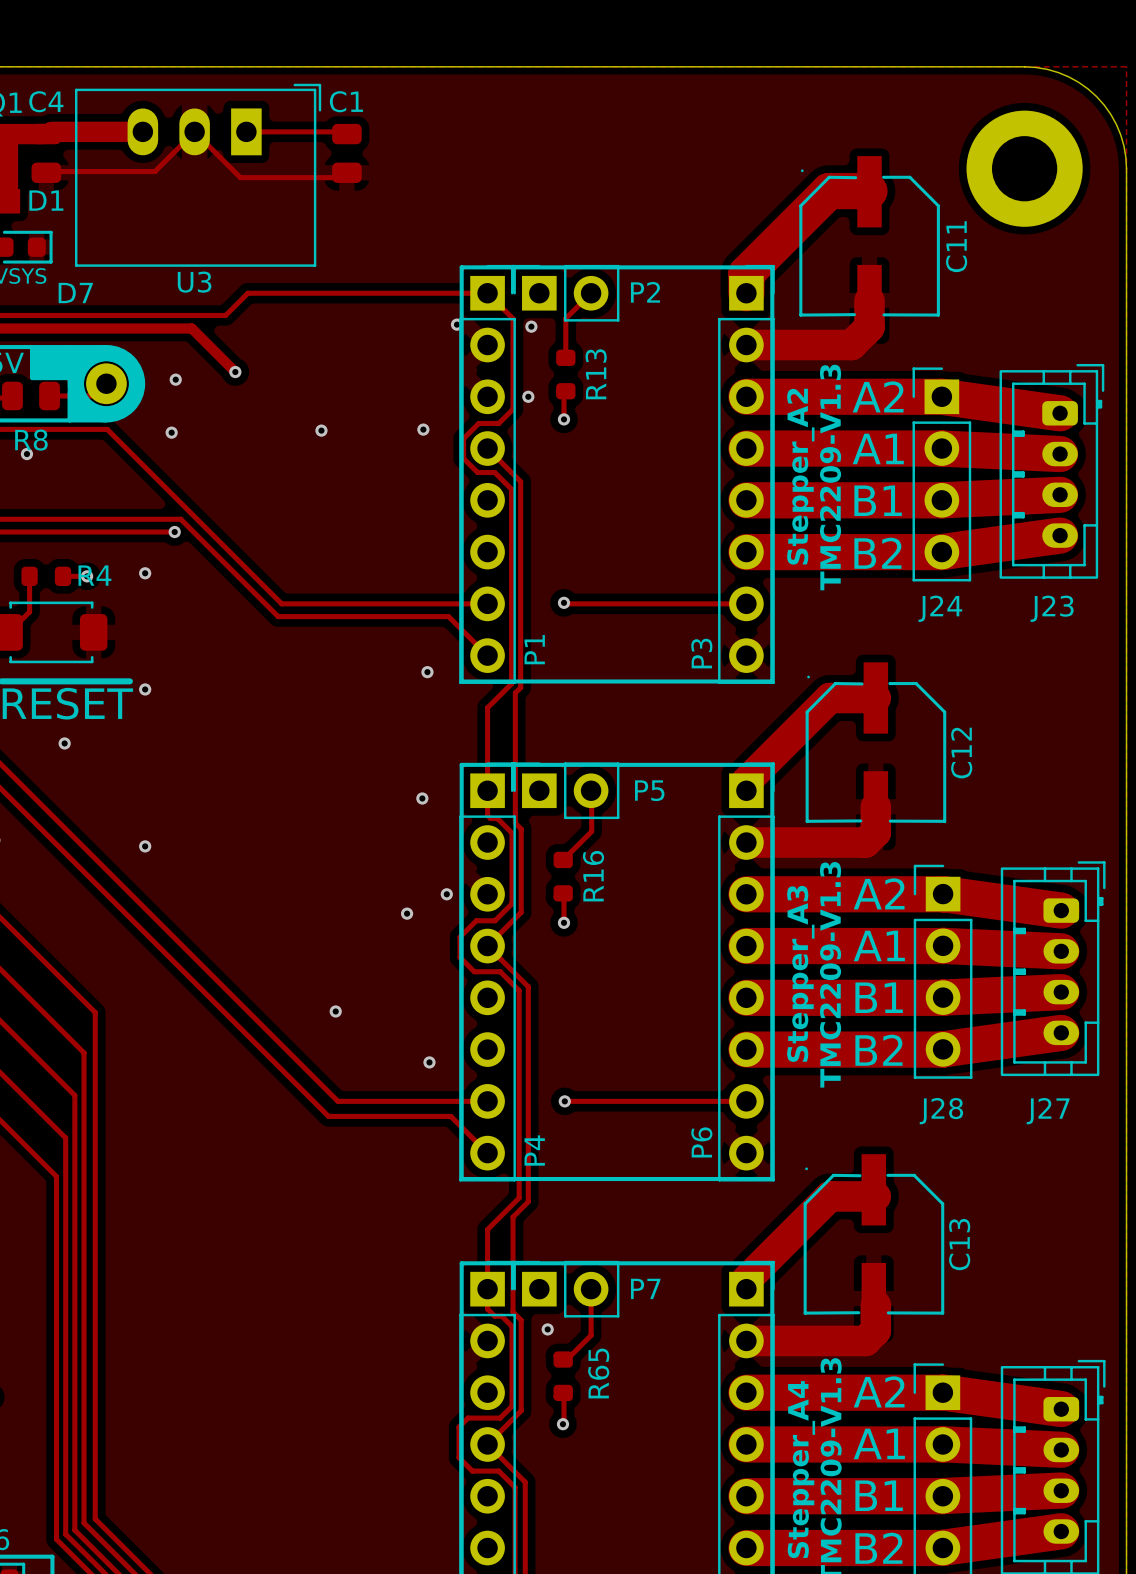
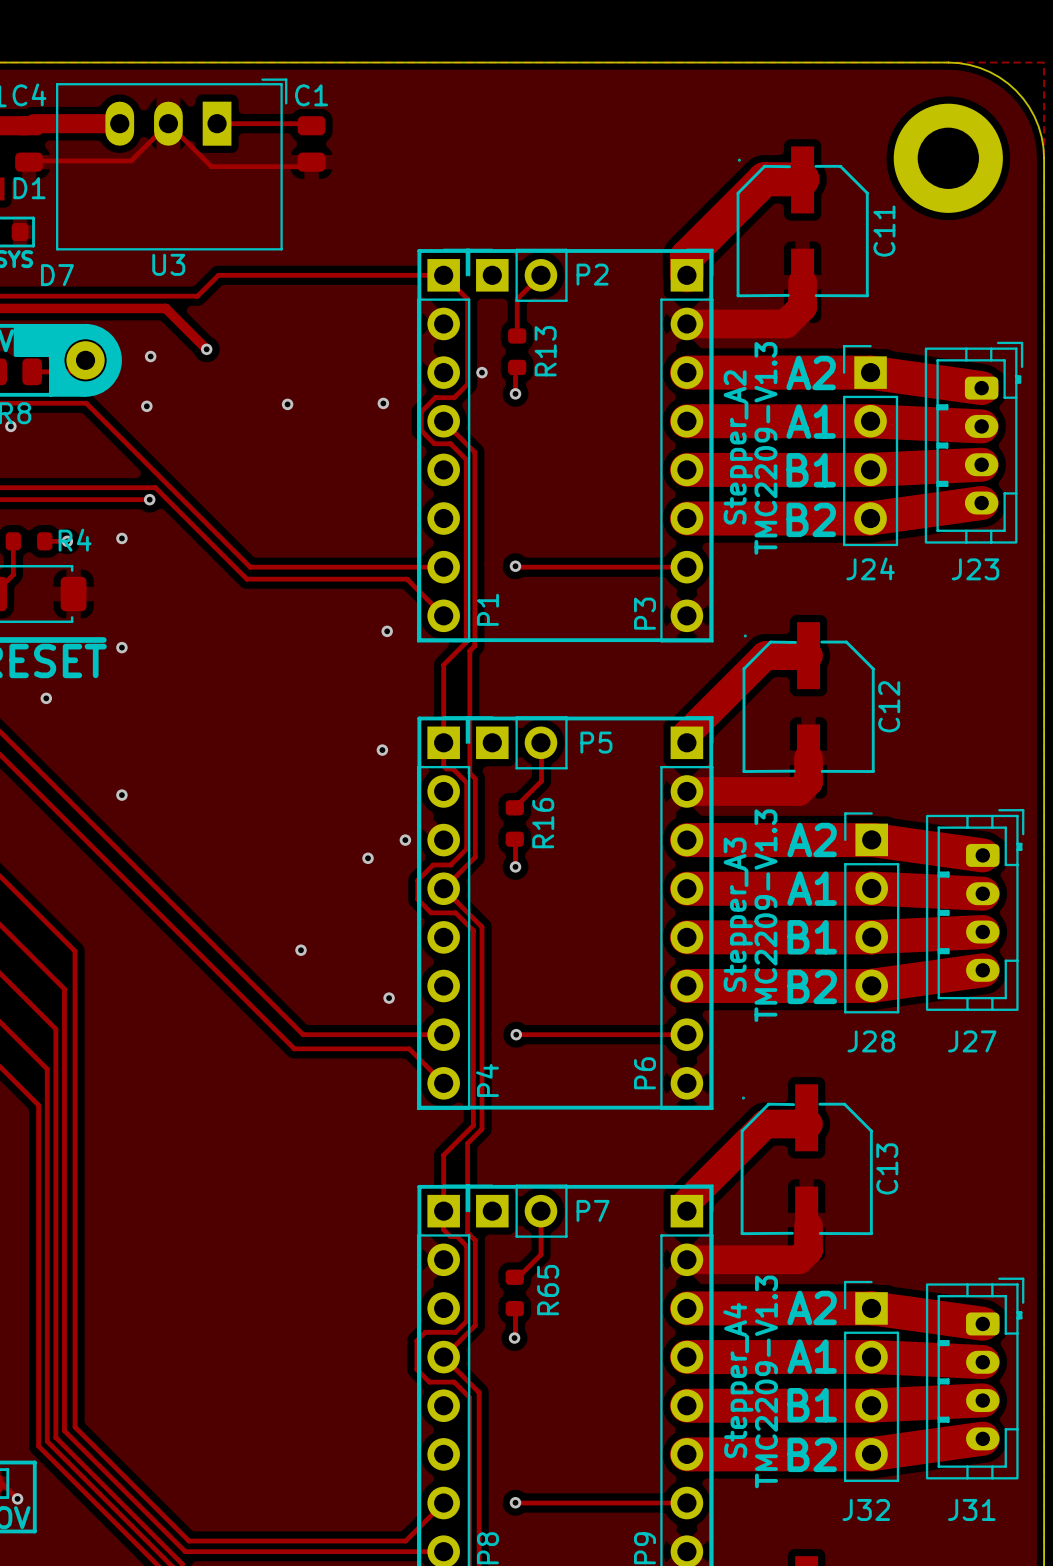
via: (456, 324) -> none
via: (531, 326) -> none
via: (547, 1329) -> none

